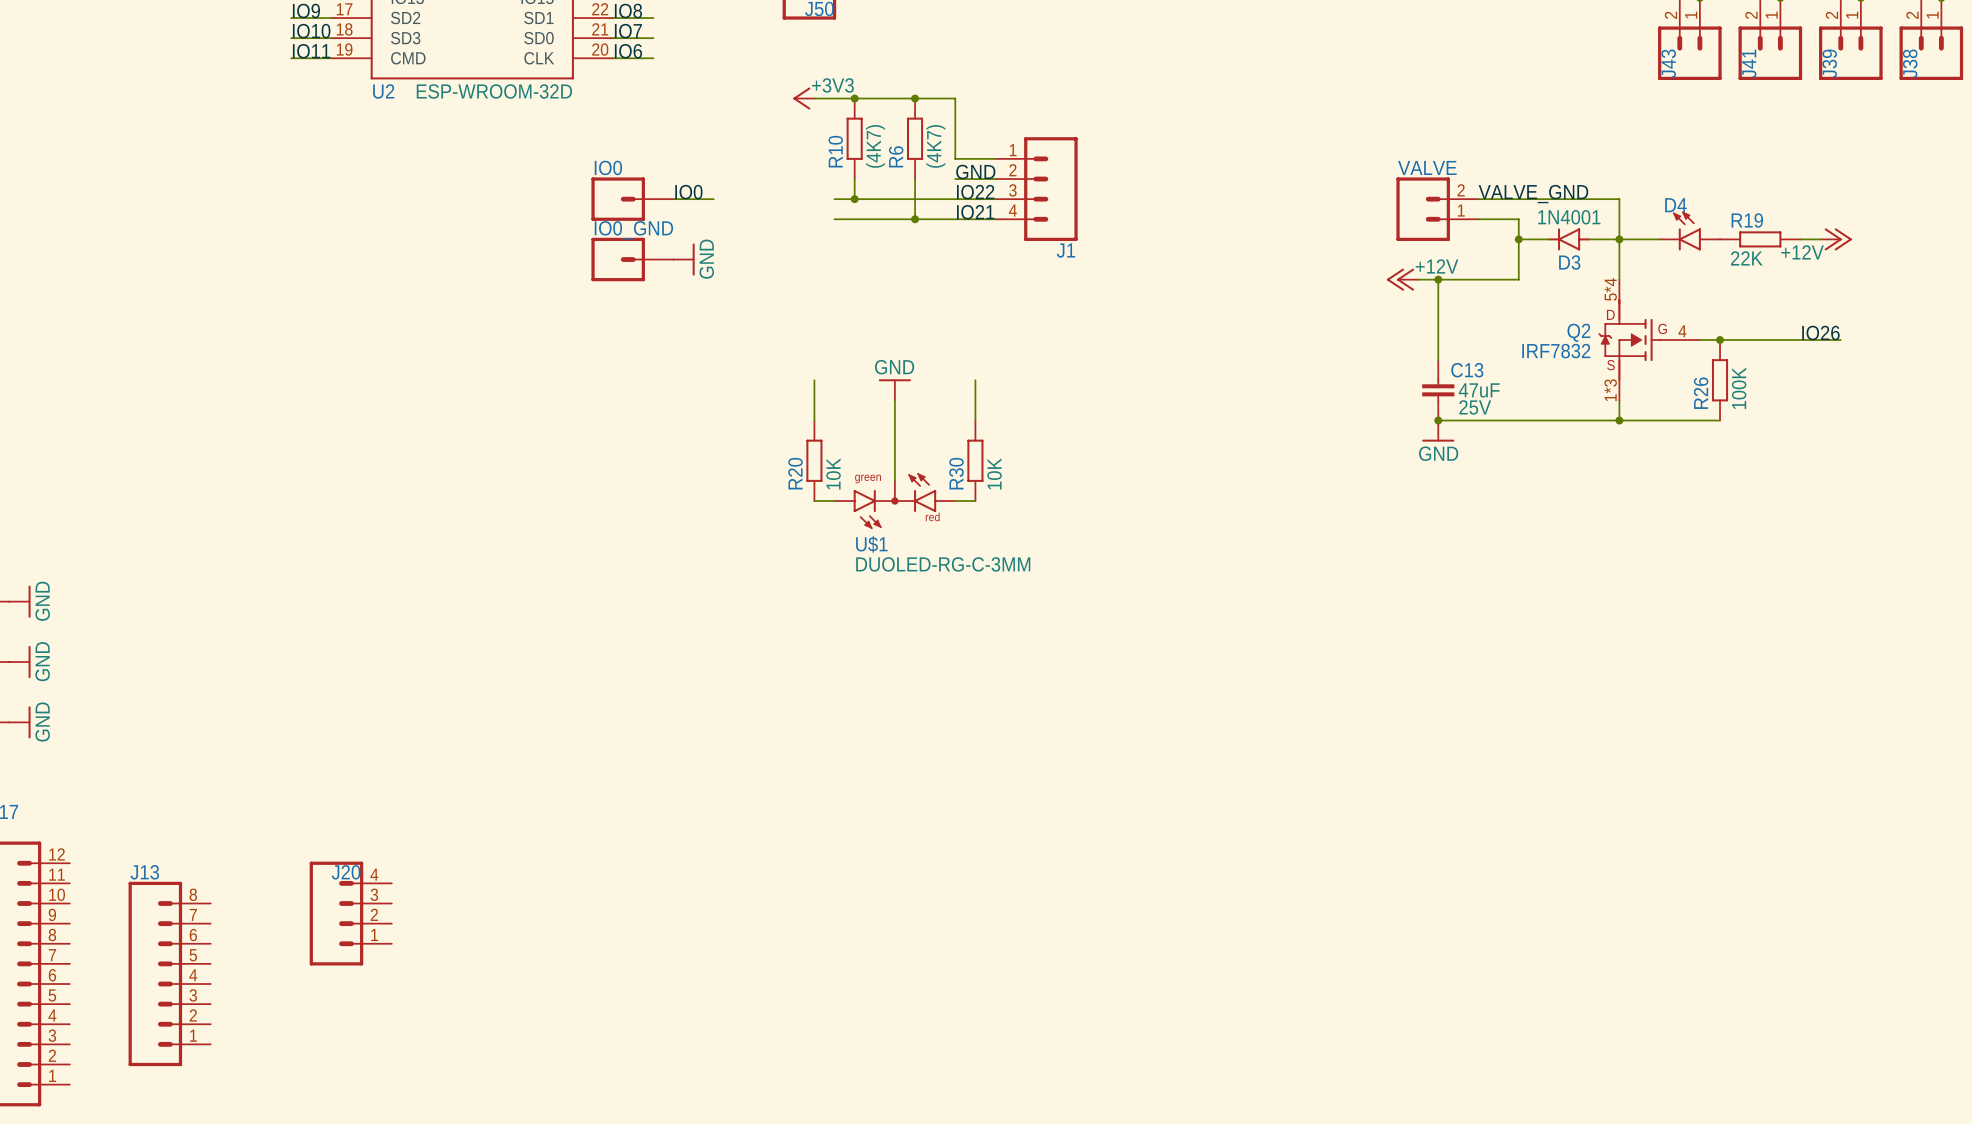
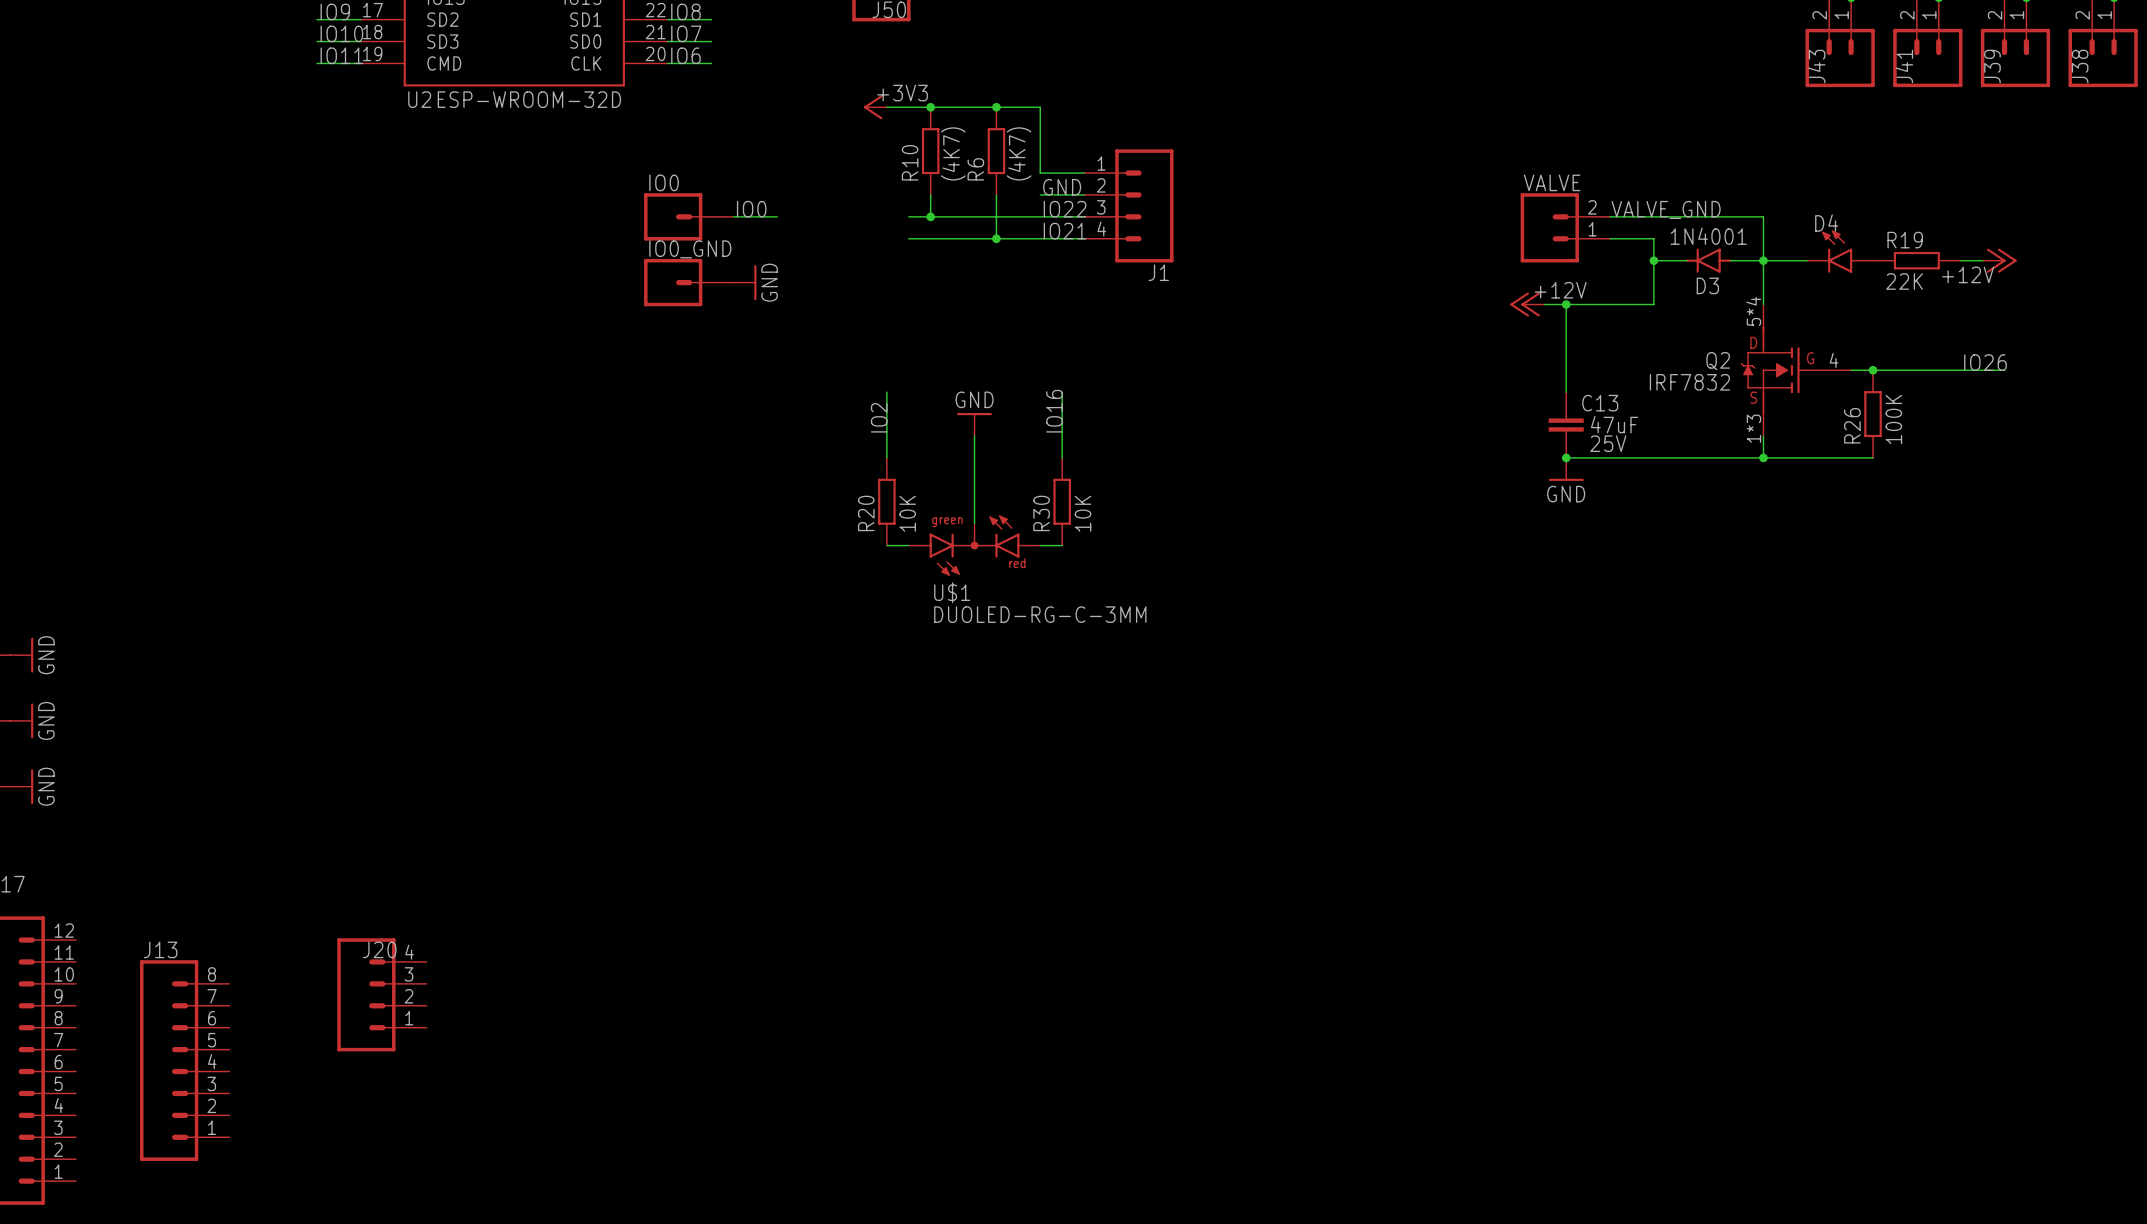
wire: none -> (886, 392) (886, 414)
wire: none -> (1062, 392) (1062, 414)
label: none -> IO16 (1054, 411)
label: none -> IO2 (879, 417)

